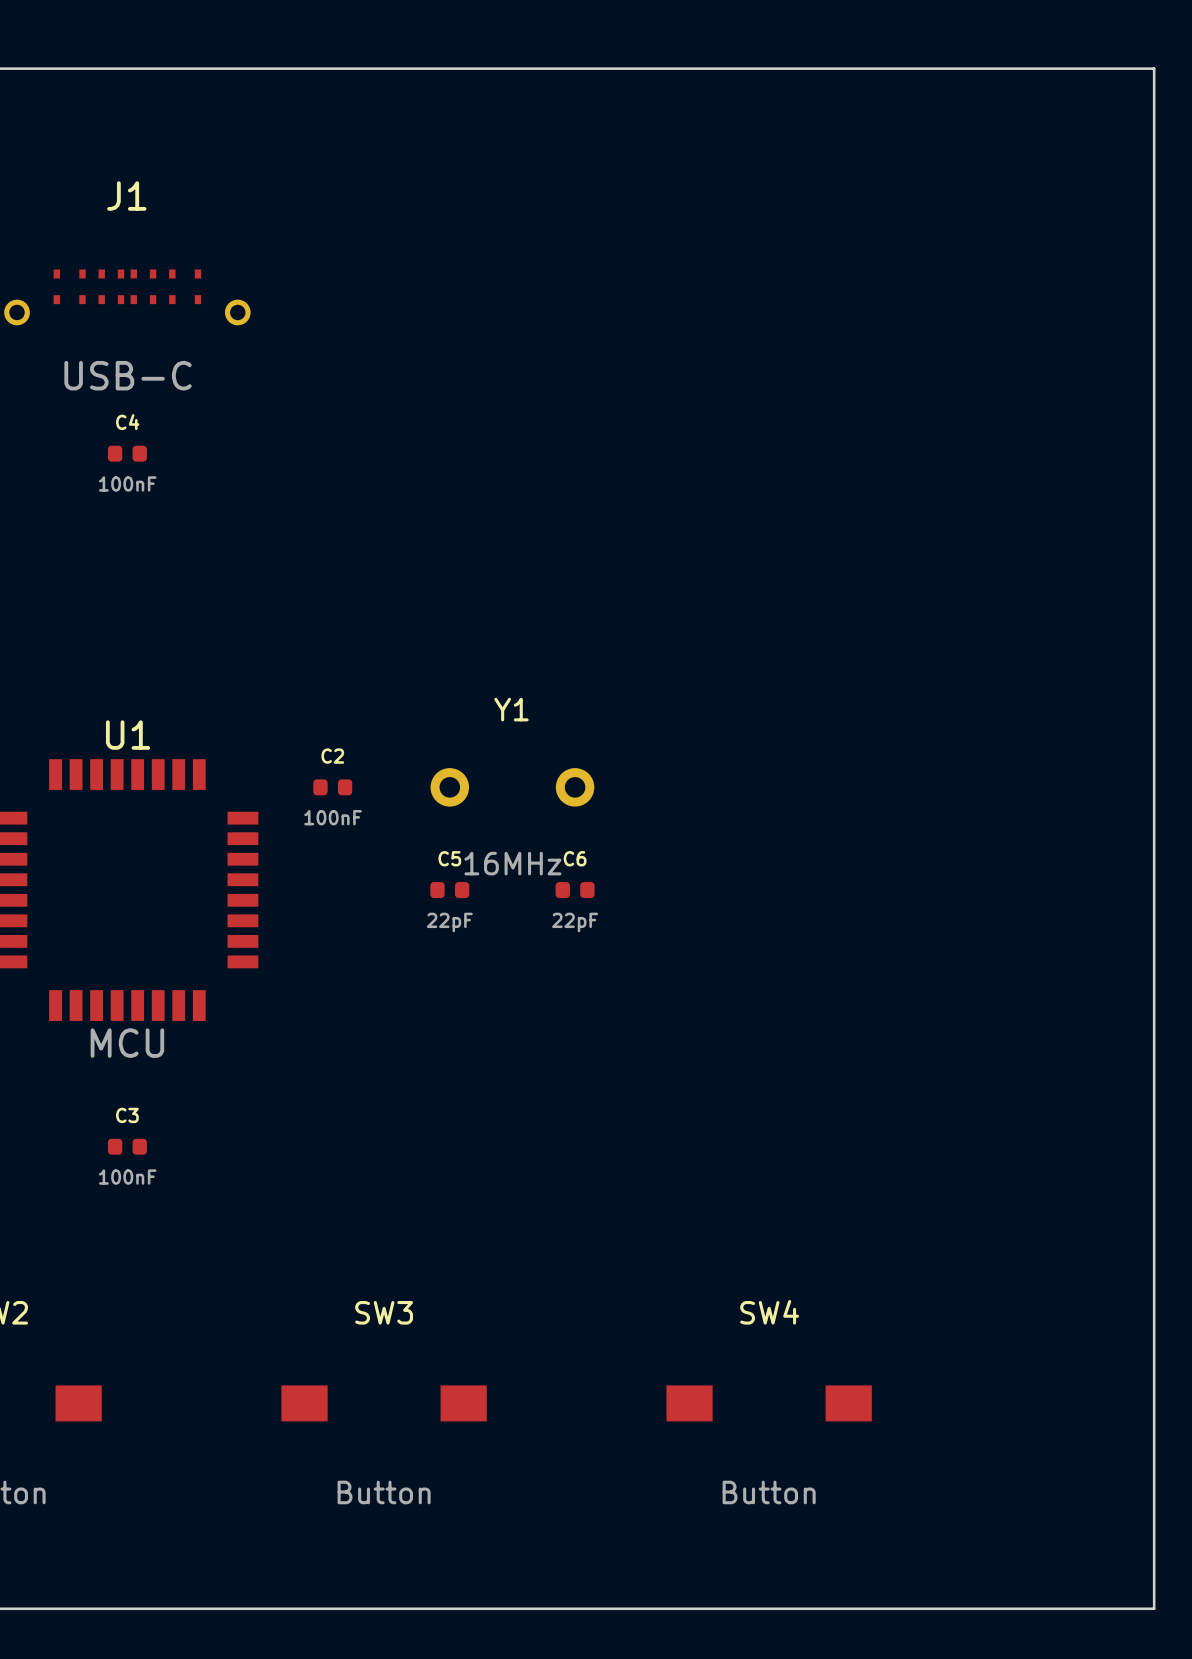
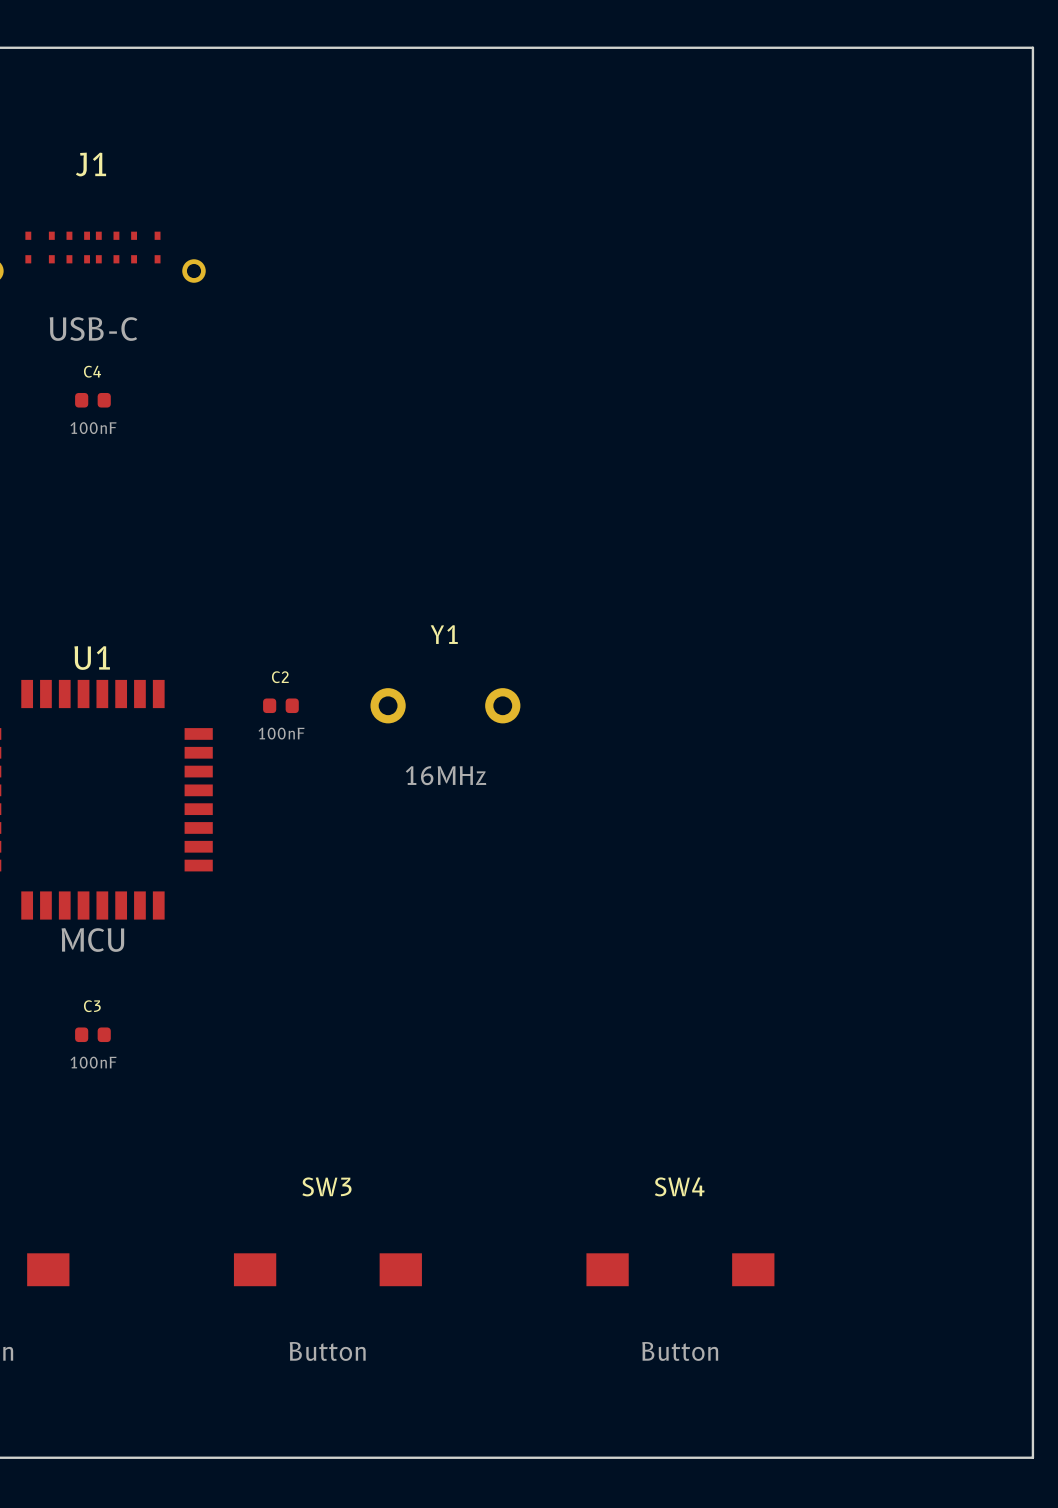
C5: 22pF (449, 890) -> none
C6: 22pF (575, 890) -> none

